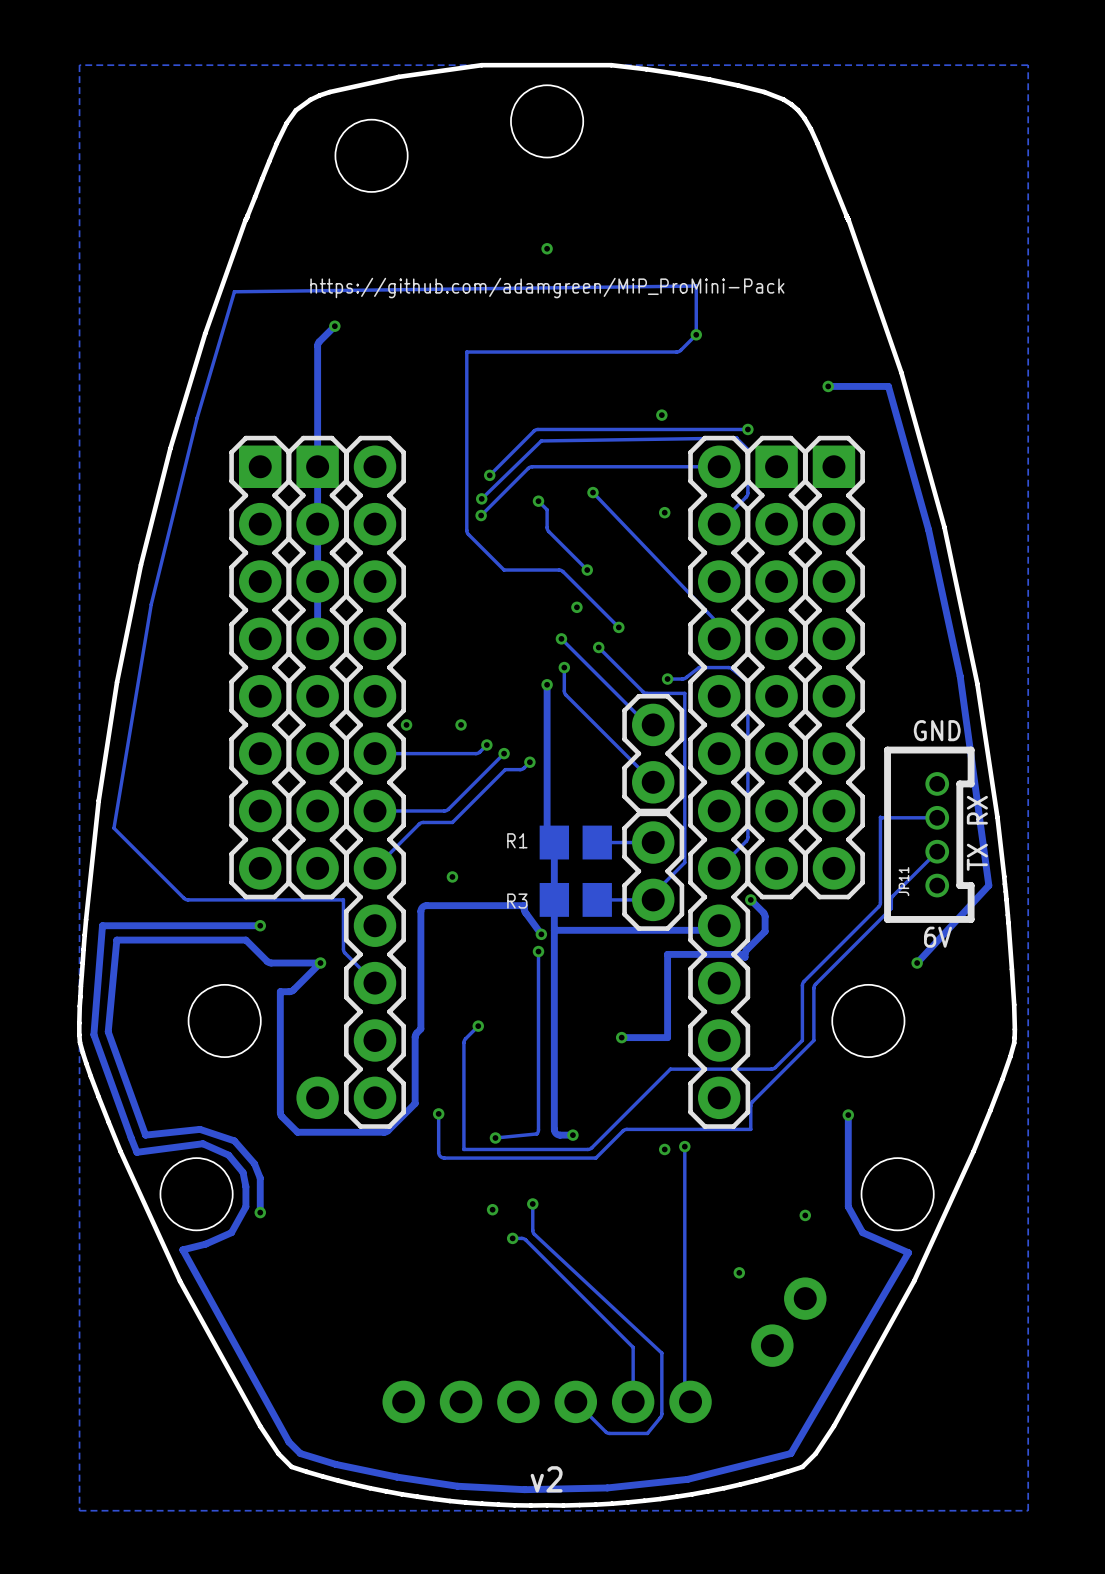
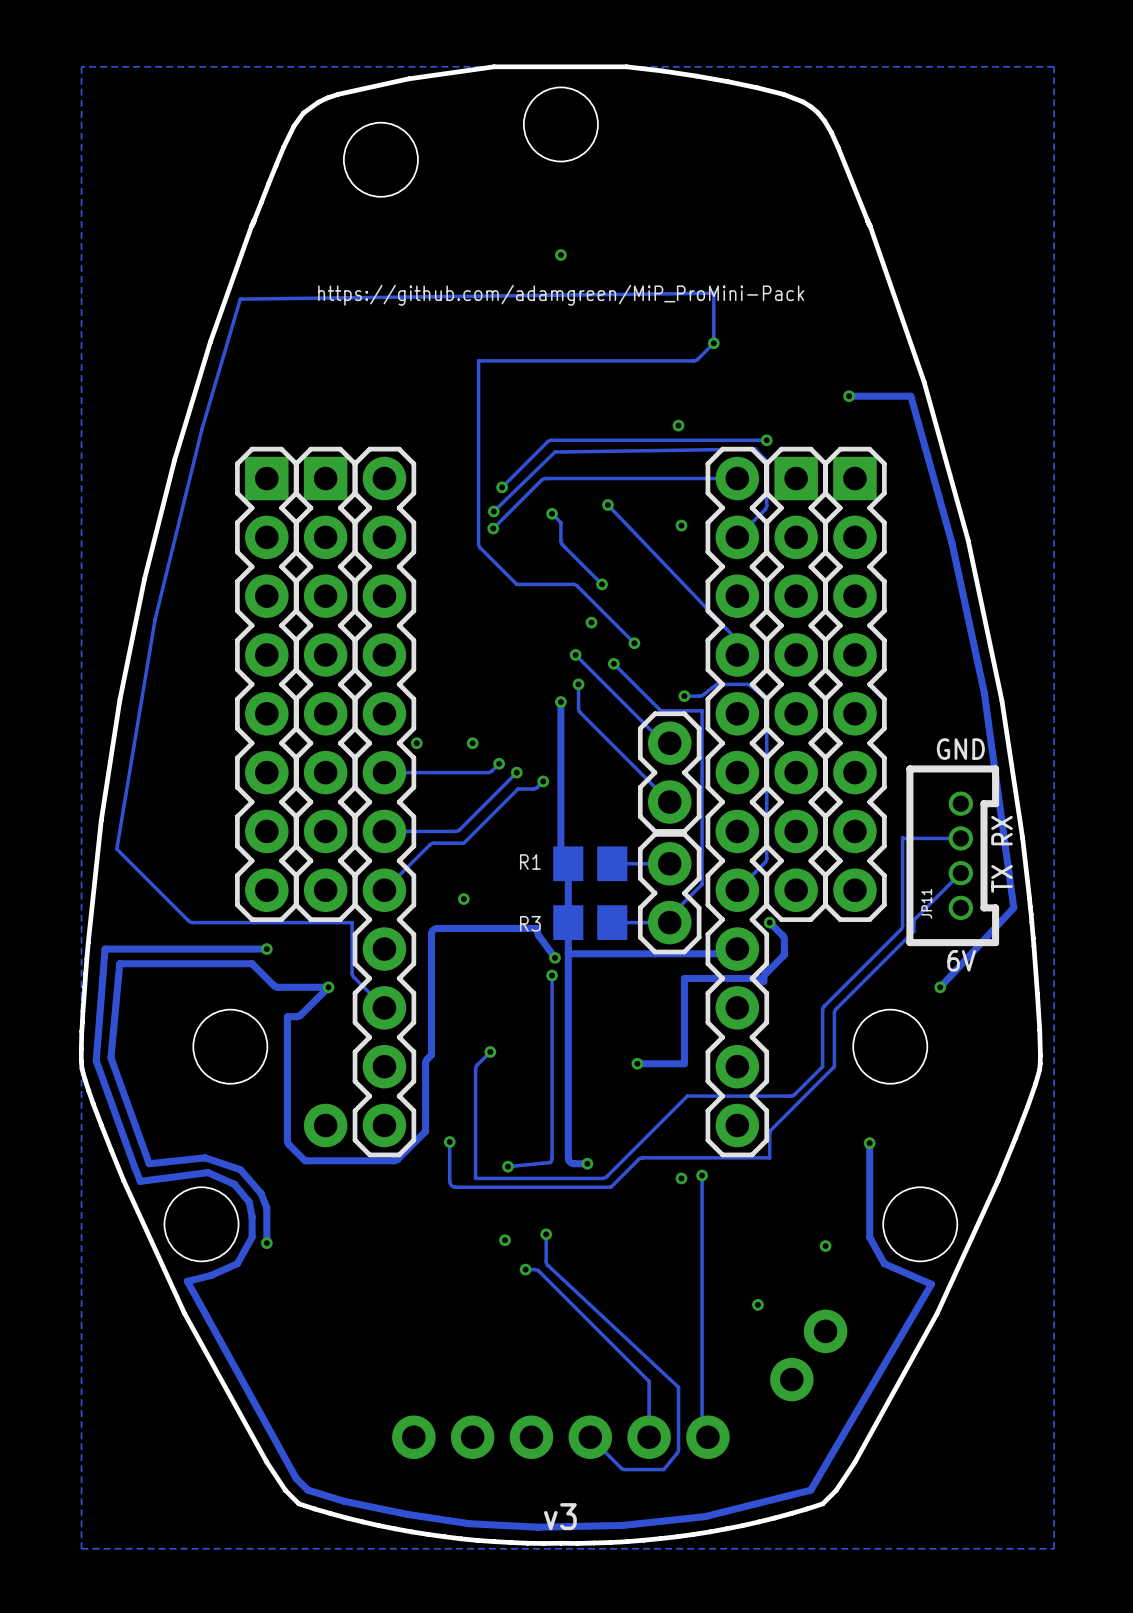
track: (334, 326) (317, 345) (317, 638) -> none
via: (334, 326) -> none
text: v2 (546, 1479) -> v3 (560, 1516)

